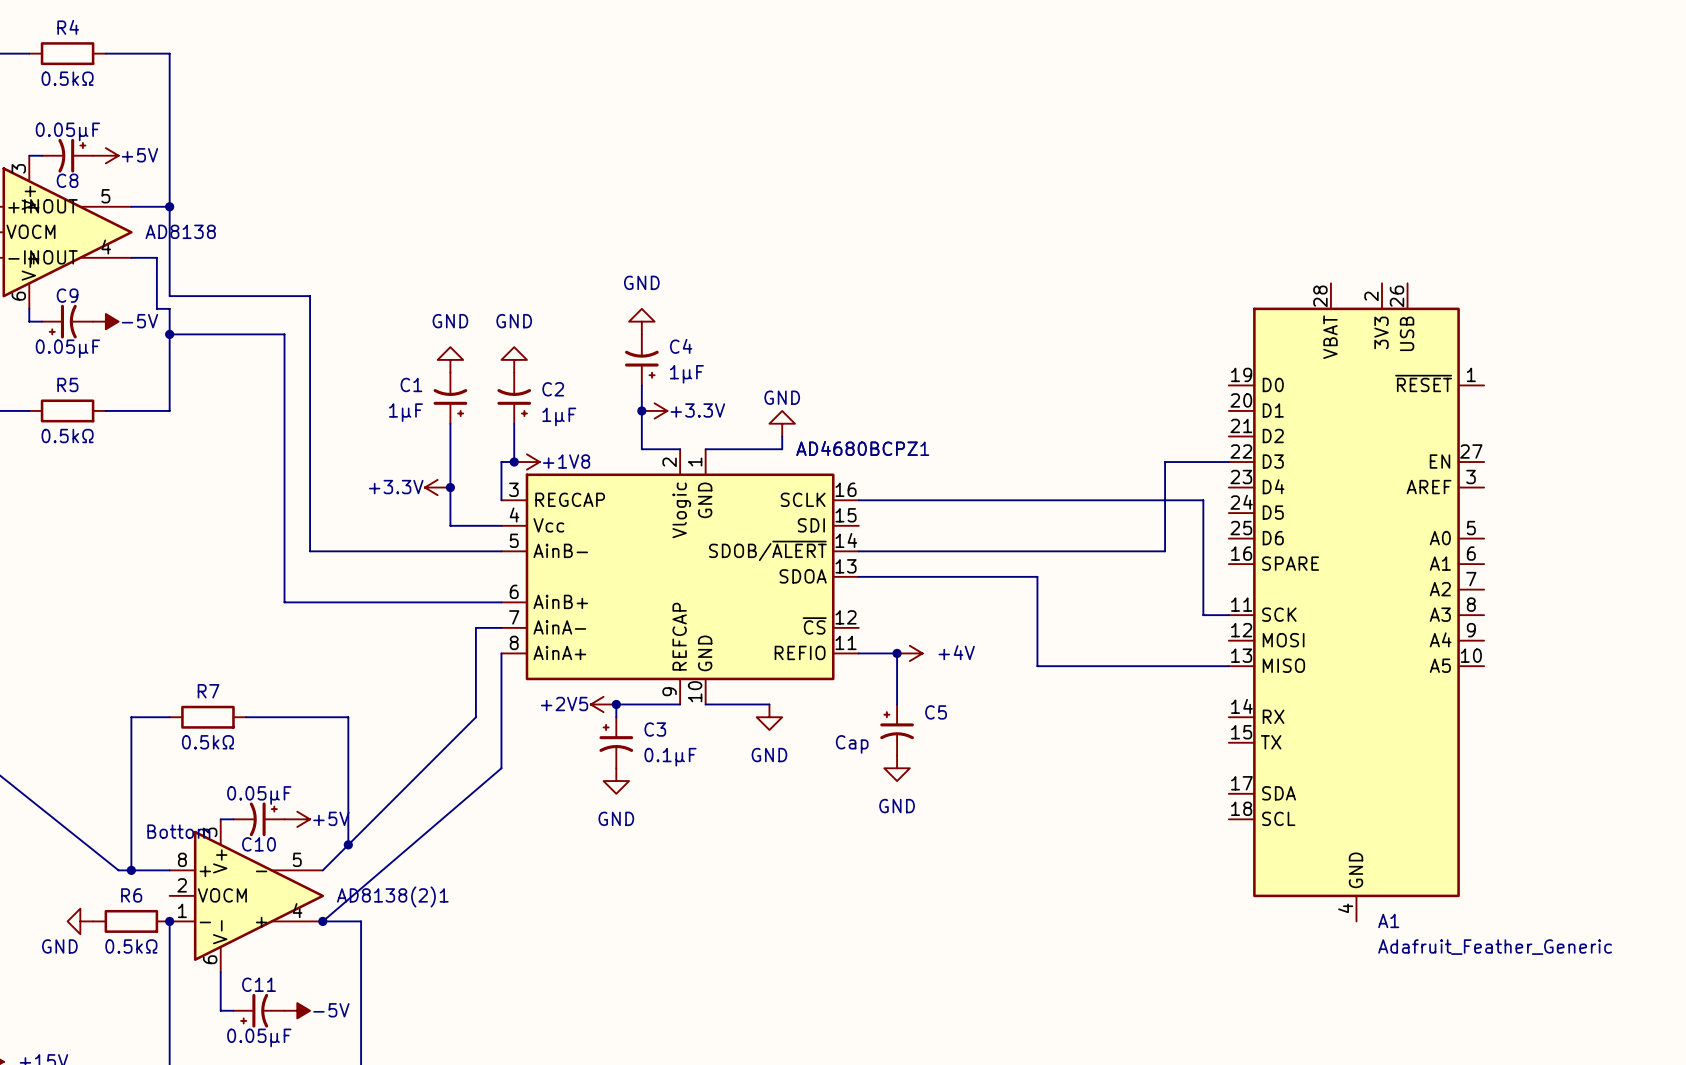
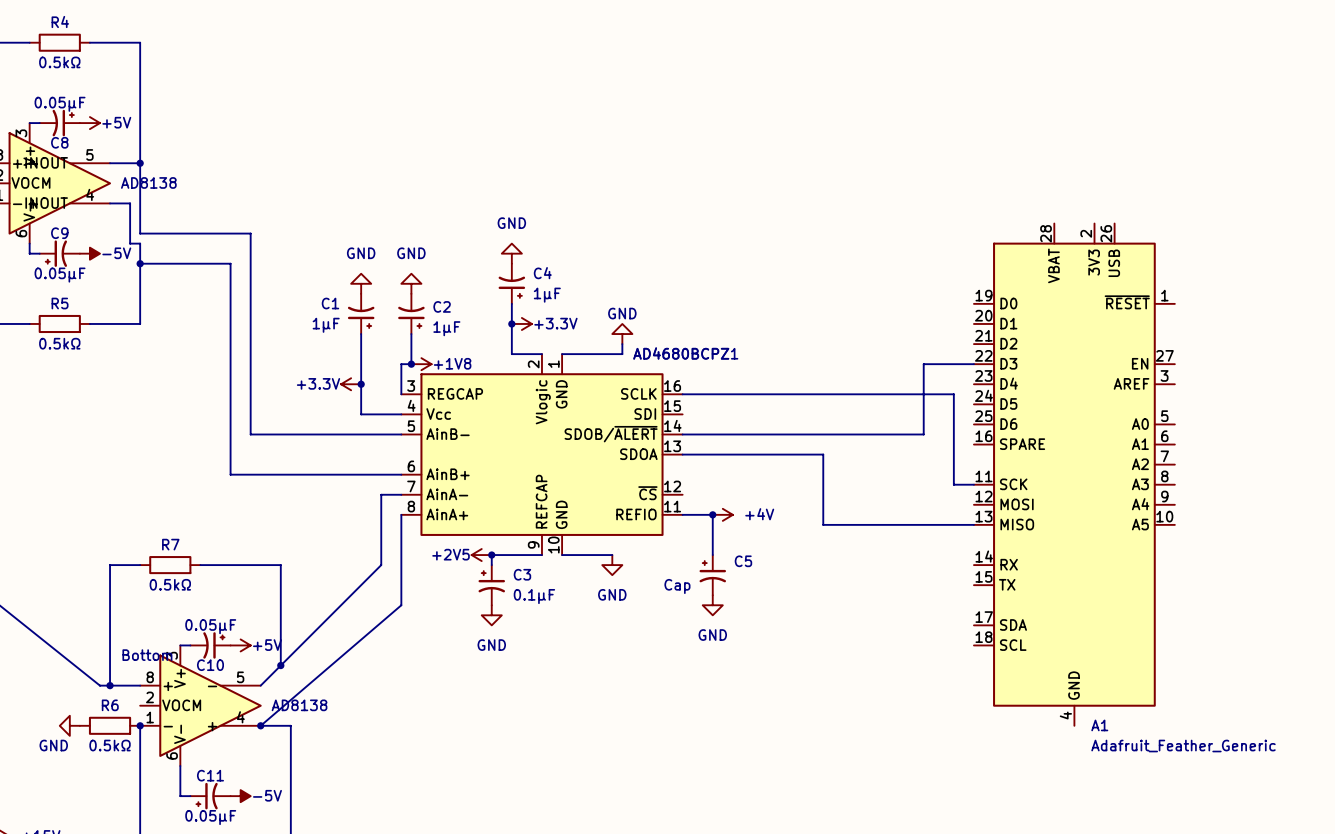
AD8138(2)1 name: AD8138(2)1 (392, 896) -> AD8138 (299, 705)

